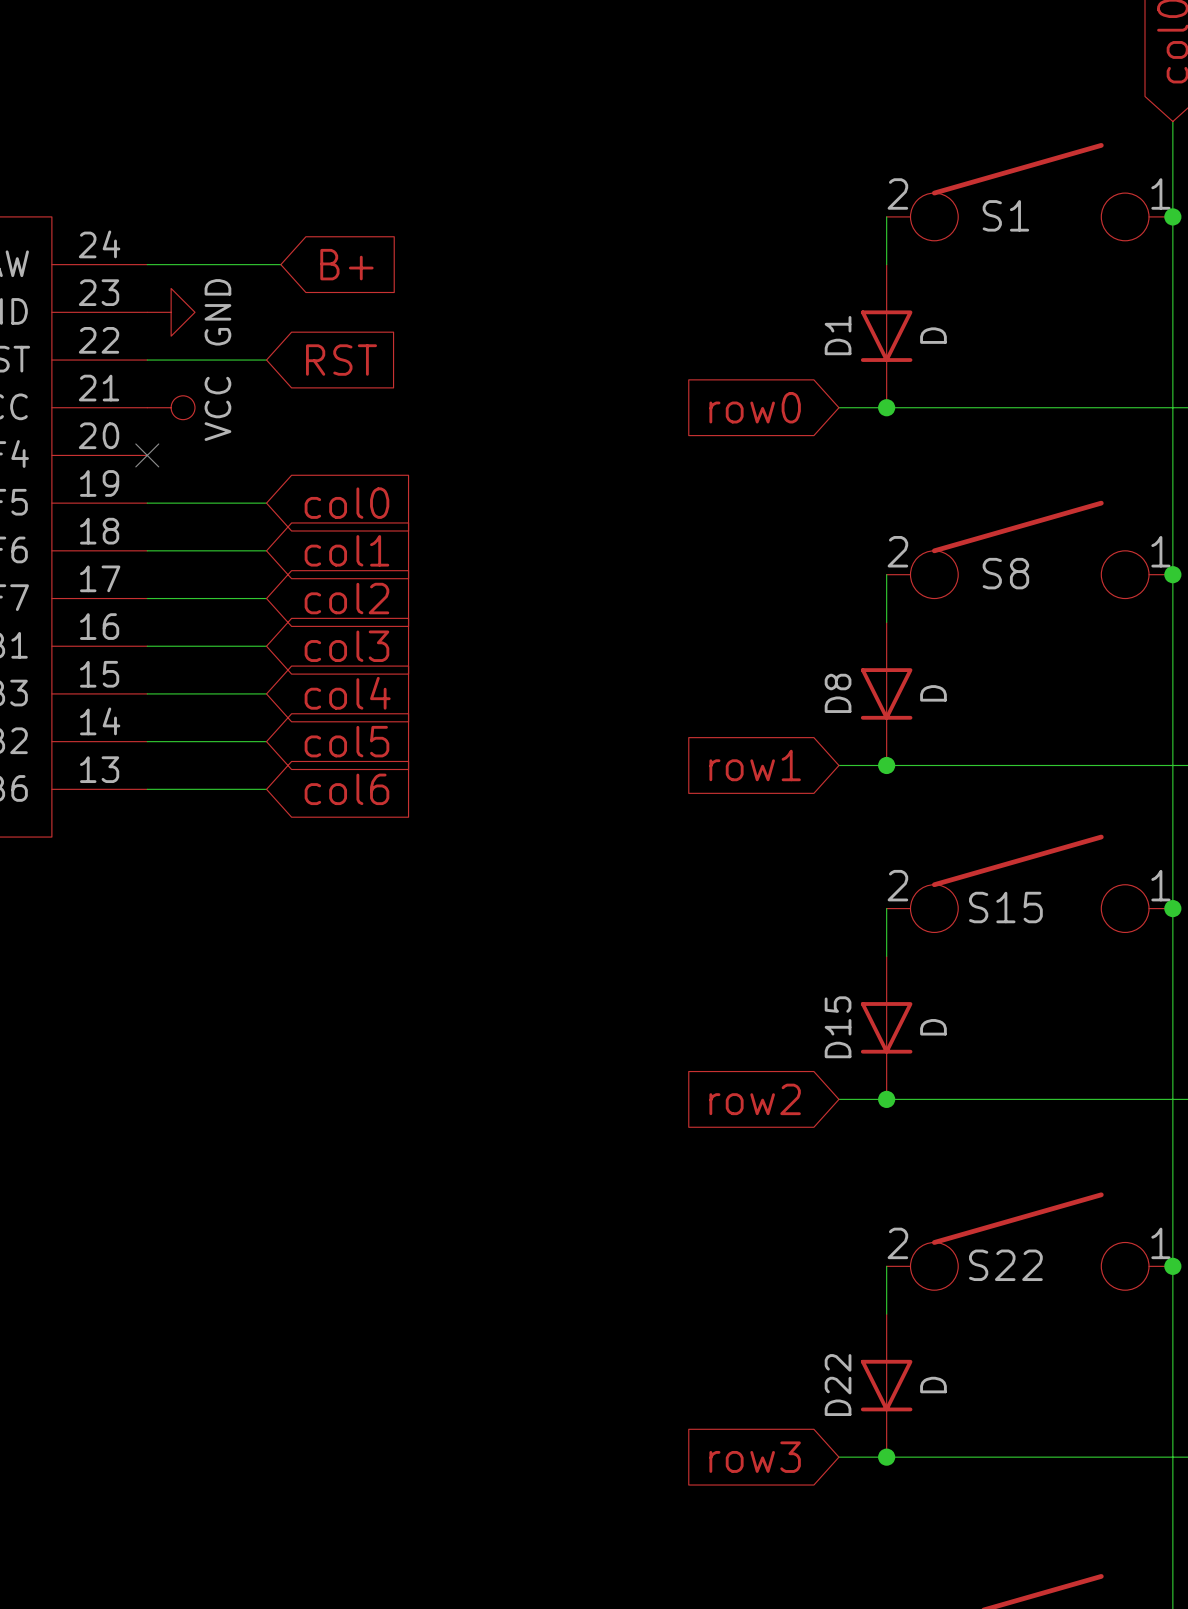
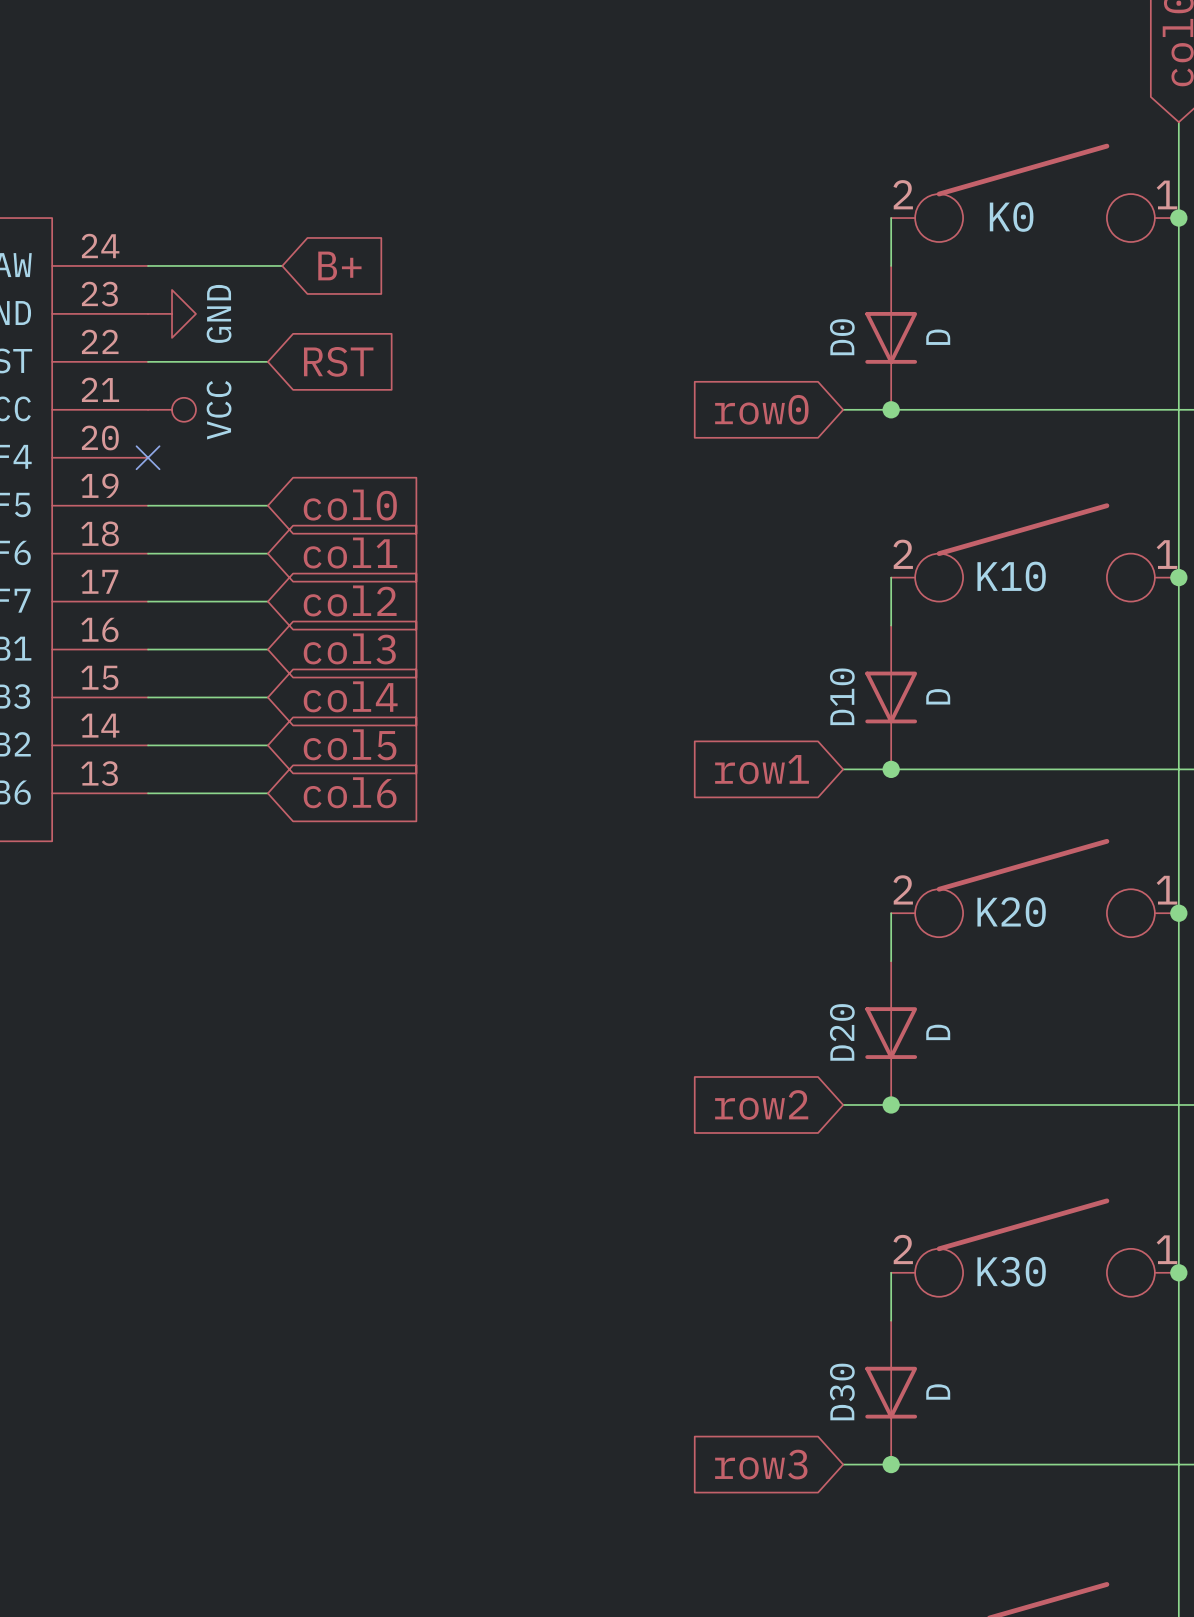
S1 name: S1 (1005, 215) -> K0 (1011, 216)
D1 name: D1 (838, 335) -> D0 (842, 337)
S8 name: S8 (1005, 573) -> K10 (1011, 576)
D8 name: D8 (838, 693) -> D10 (842, 696)
S15 name: S15 (1005, 907) -> K20 (1011, 912)
D15 name: D15 (838, 1027) -> D20 (842, 1032)
S22 name: S22 (1005, 1265) -> K30 (1011, 1271)
D22 name: D22 (838, 1385) -> D30 (842, 1391)

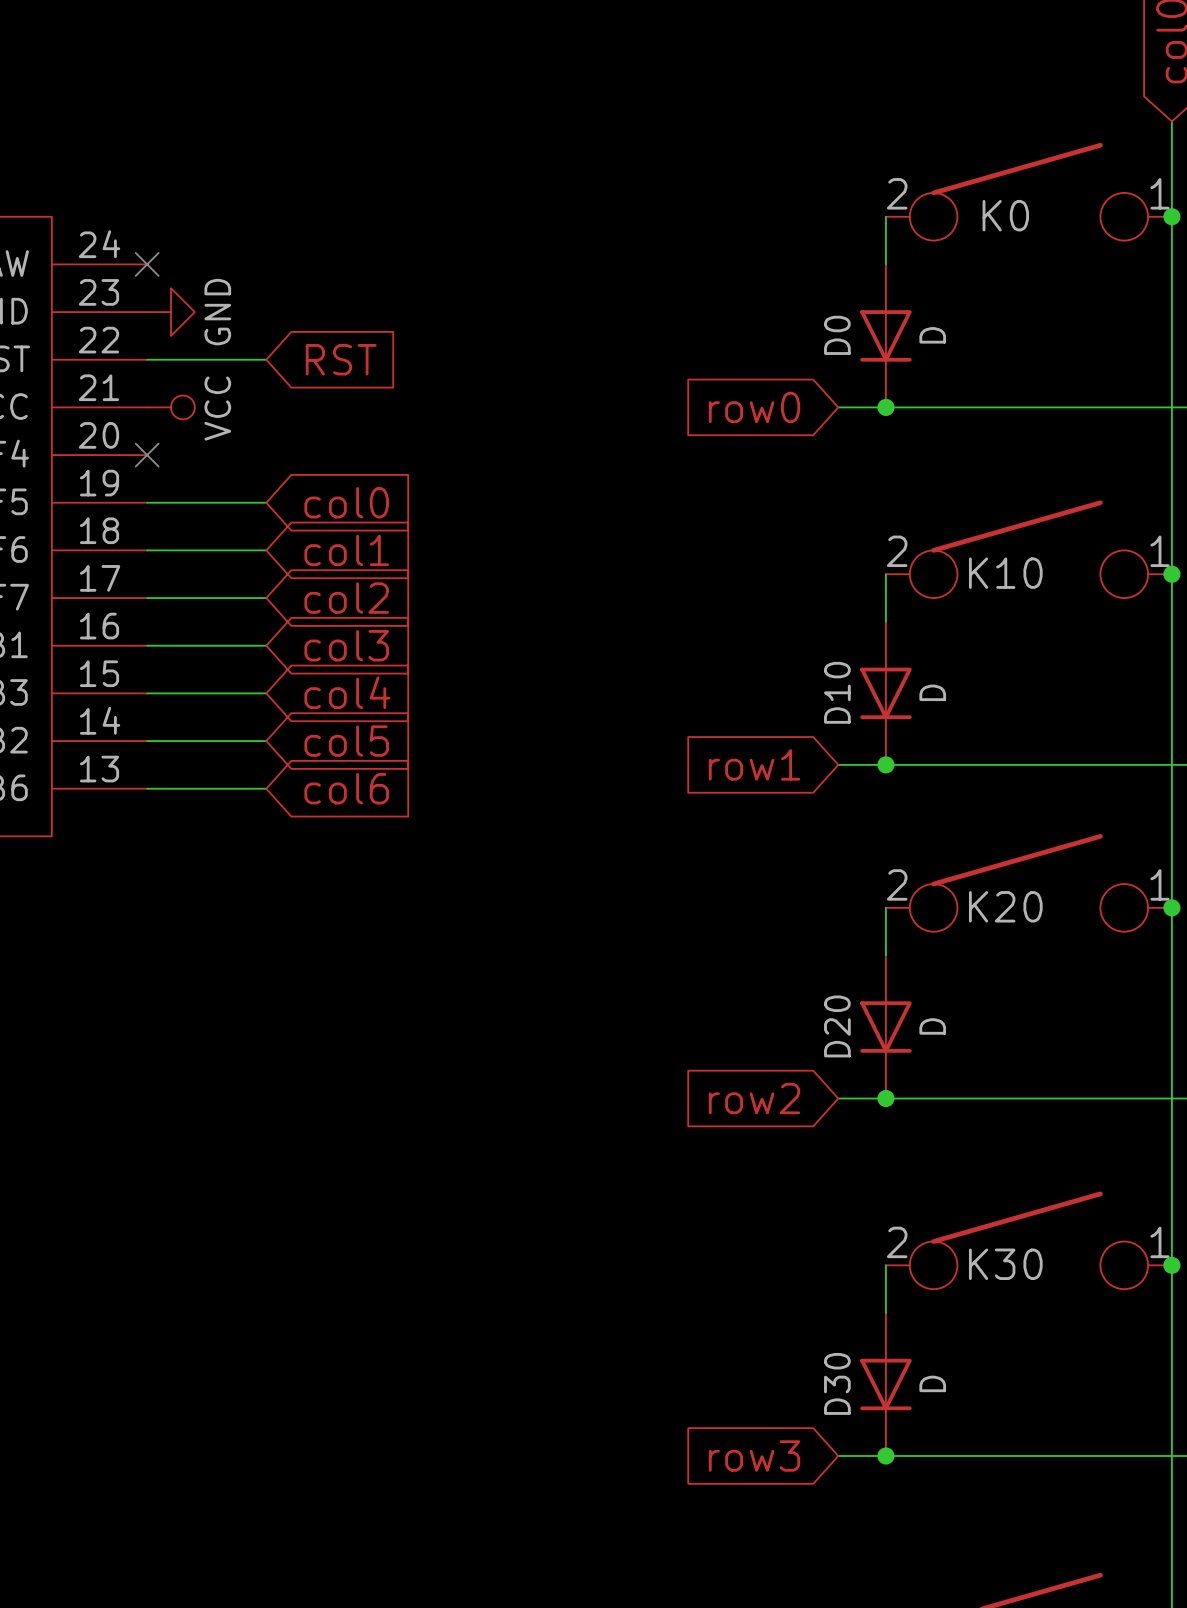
wire: (148, 265) (282, 265) -> none
no-connect mark: none -> (147, 264)
global label: B+ (339, 265) -> none

